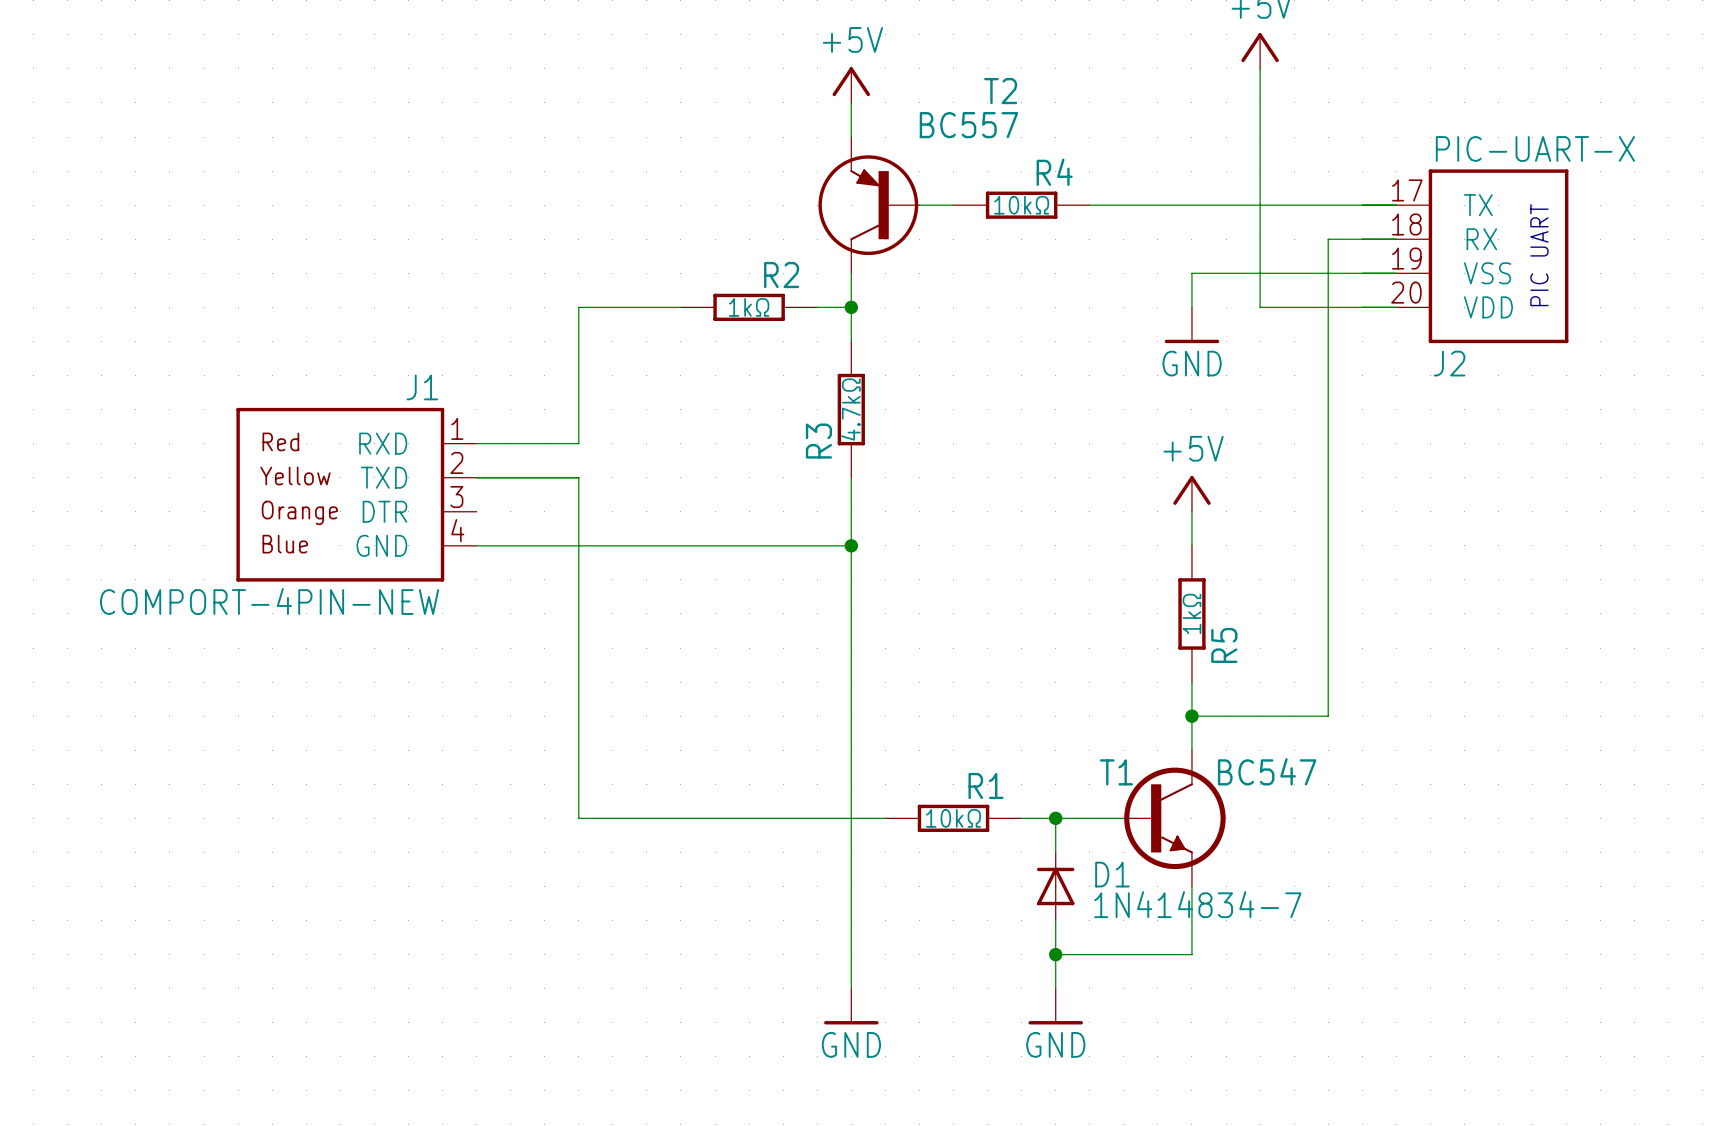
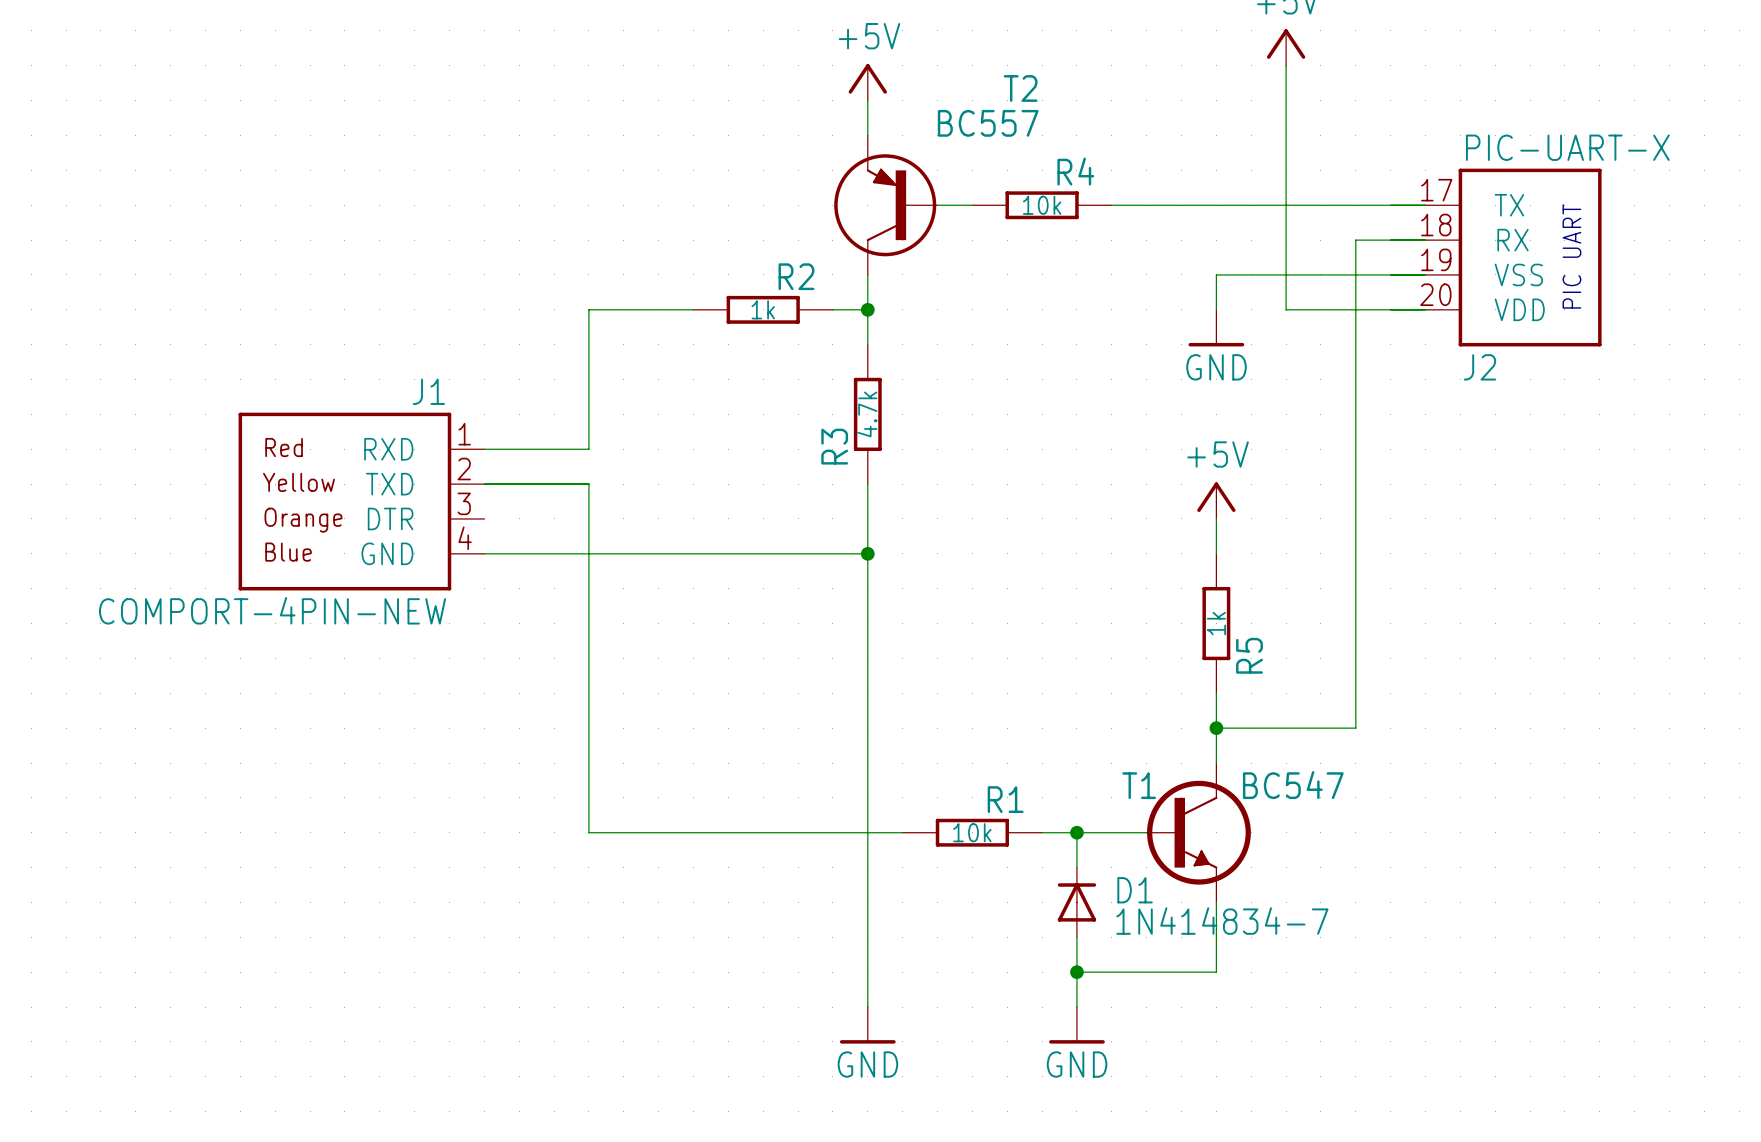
R4 value: 10kΩ (1021, 205) -> 10k (1042, 205)
R2 value: 1kΩ (749, 307) -> 1k (763, 309)
R3 value: 4.7kΩ (850, 409) -> 4.7k (867, 414)
R5 value: 1kΩ (1191, 613) -> 1k (1216, 623)
R1 value: 10kΩ (953, 818) -> 10k (972, 832)

